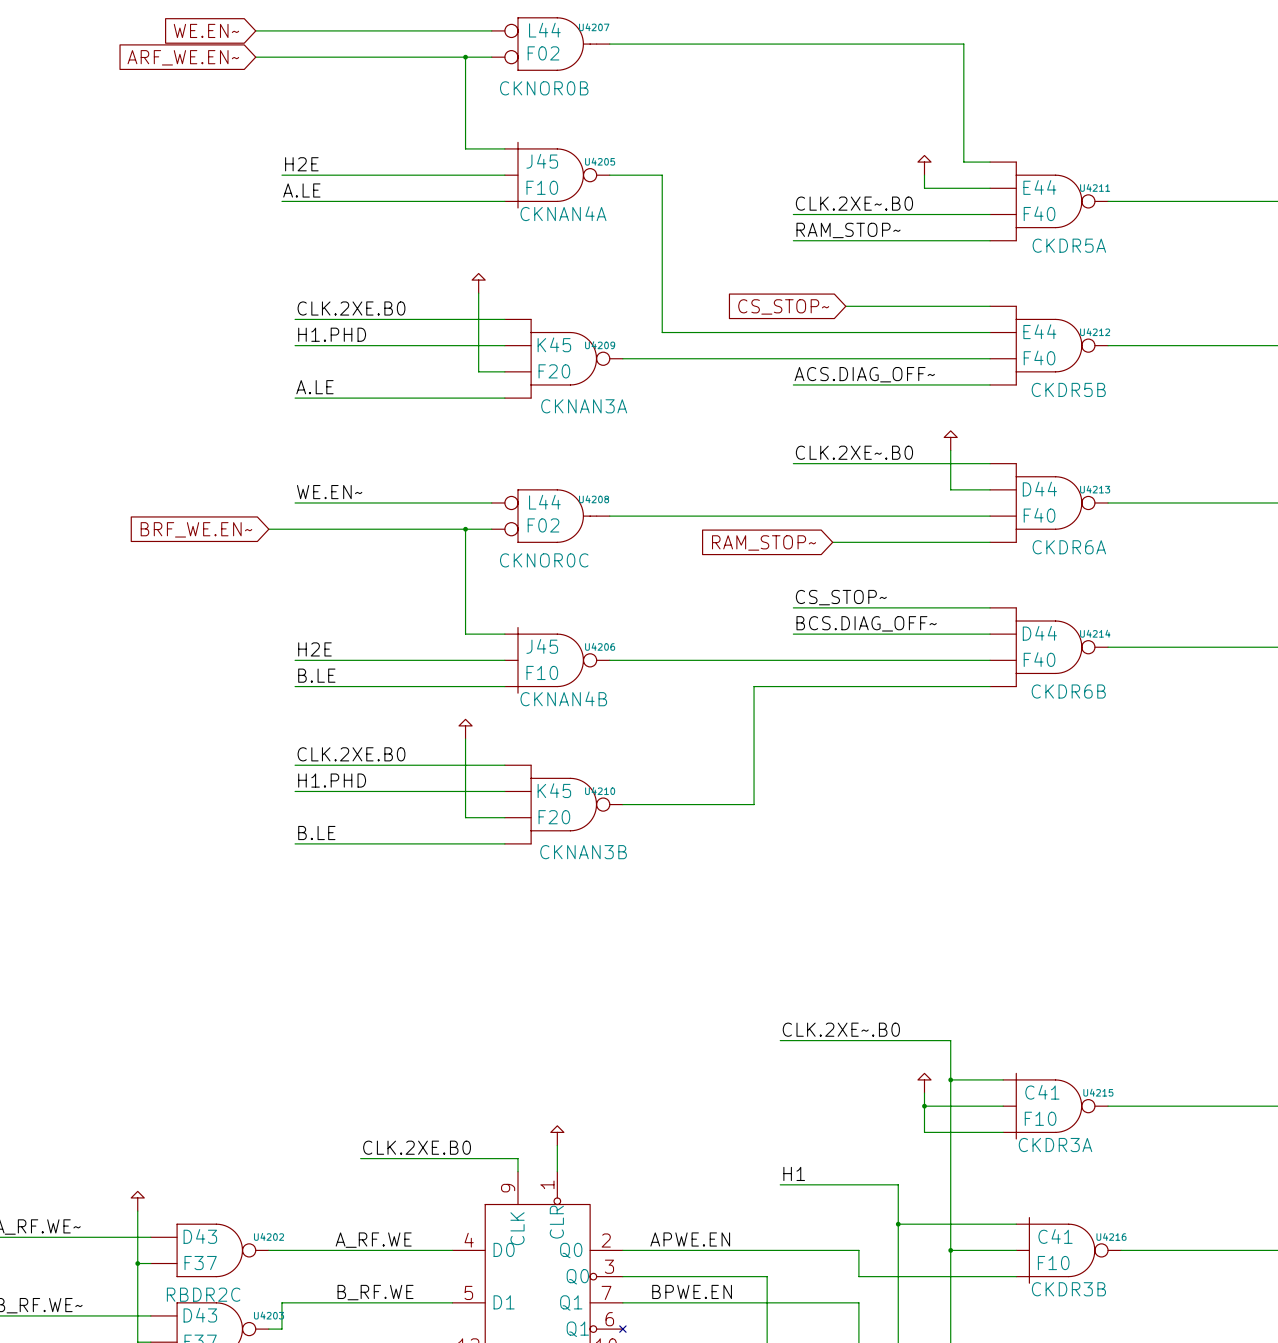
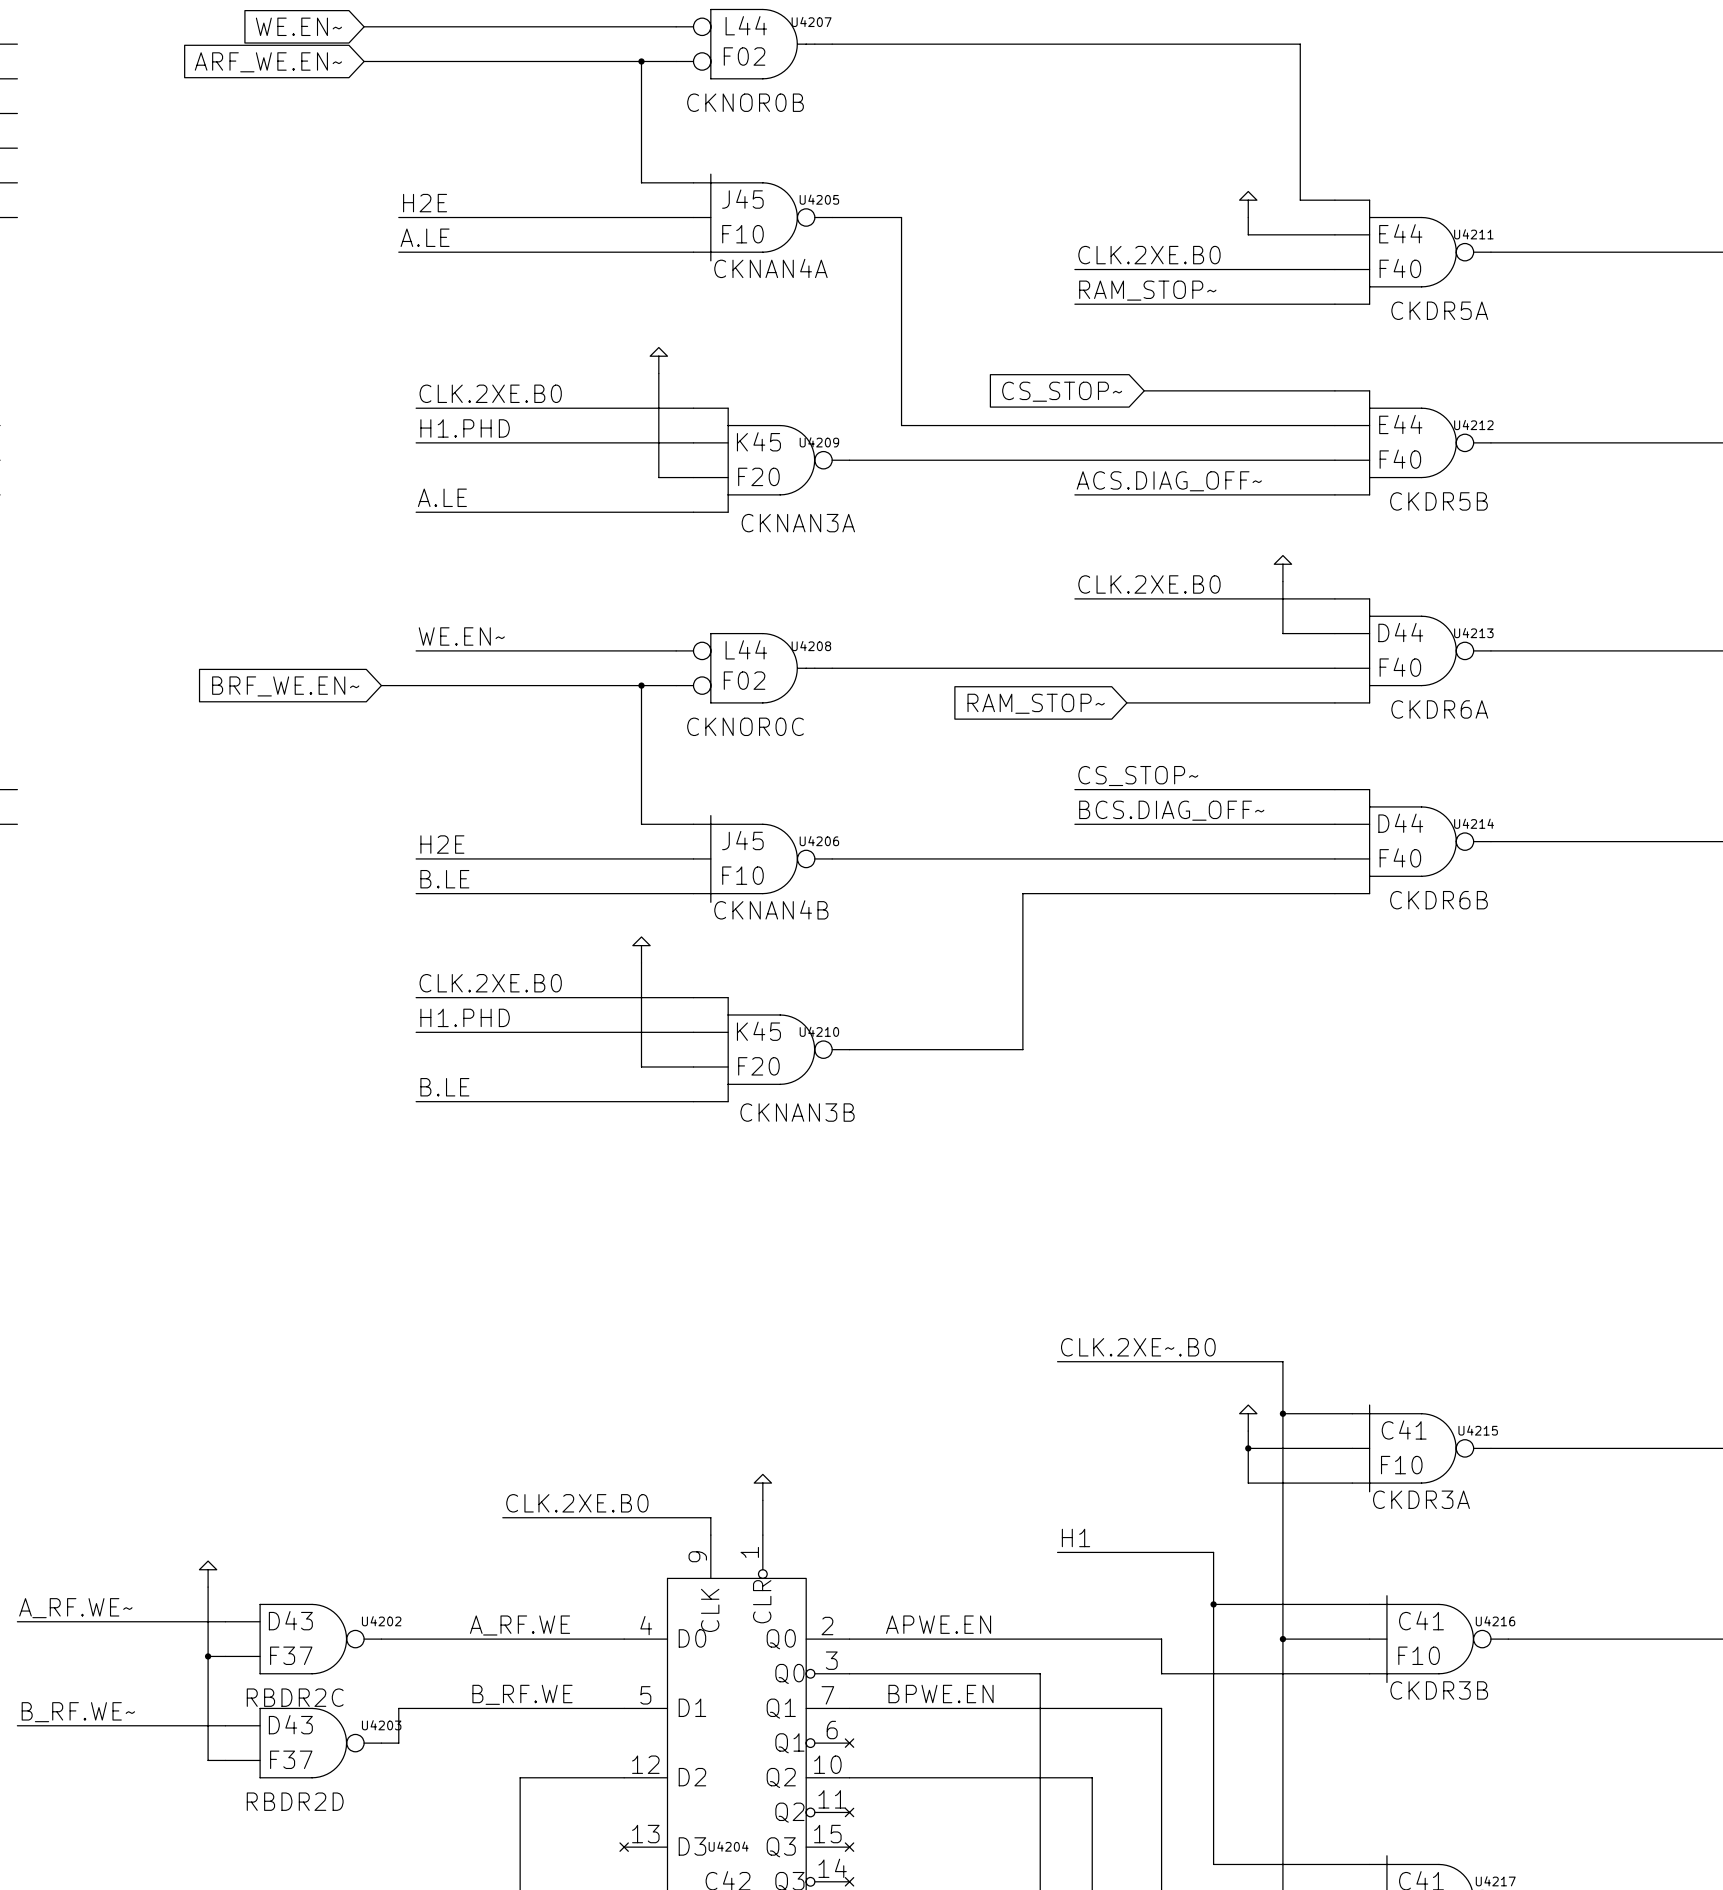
label: CLK.2XE~.B0 (854, 203) -> CLK.2XE.B0 (1149, 255)
label: CLK.2XE~.B0 (854, 452) -> CLK.2XE.B0 (1149, 584)

